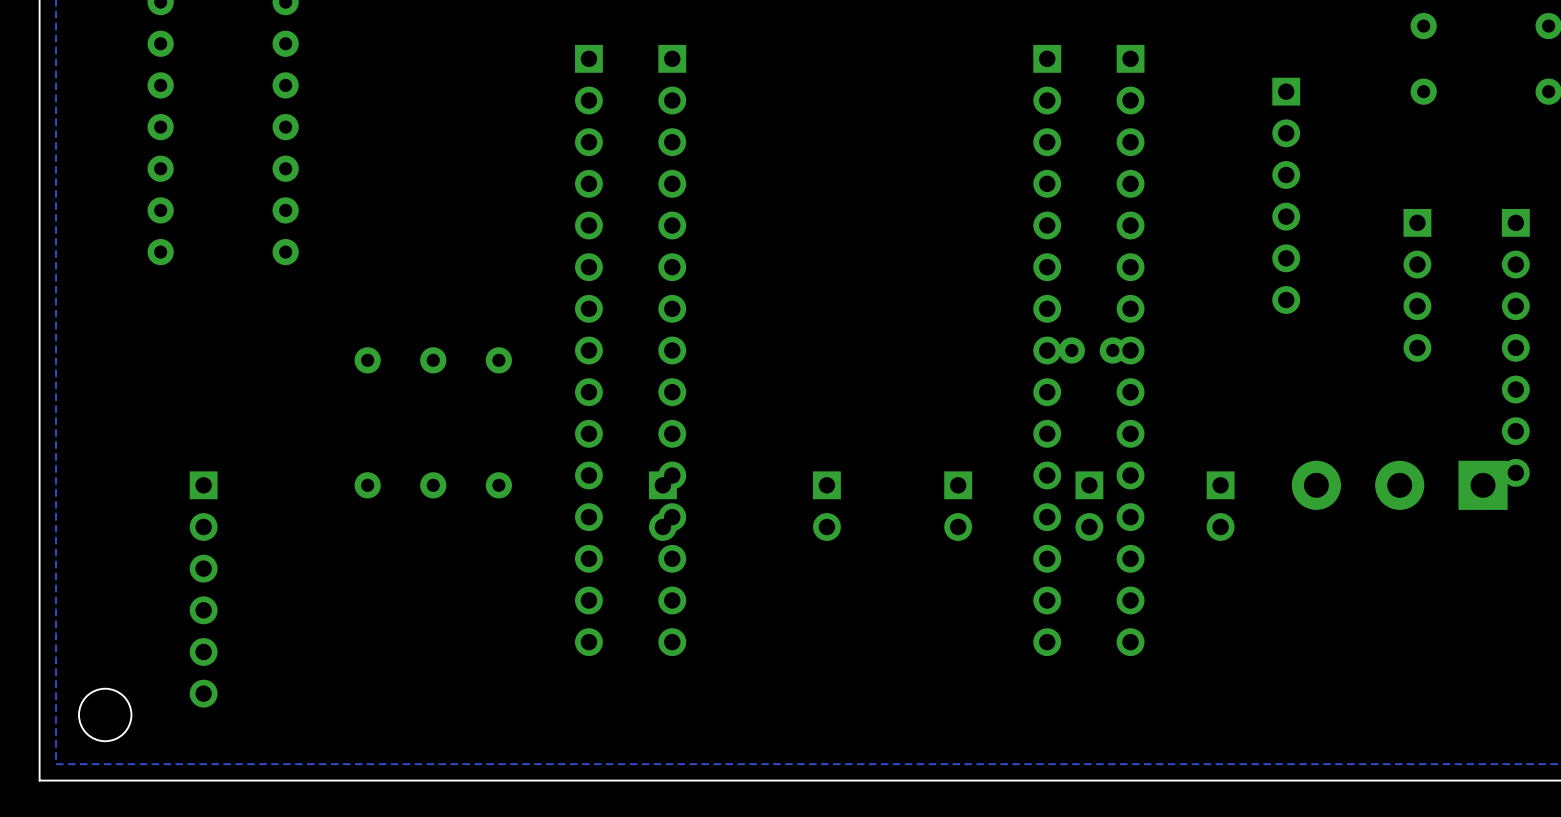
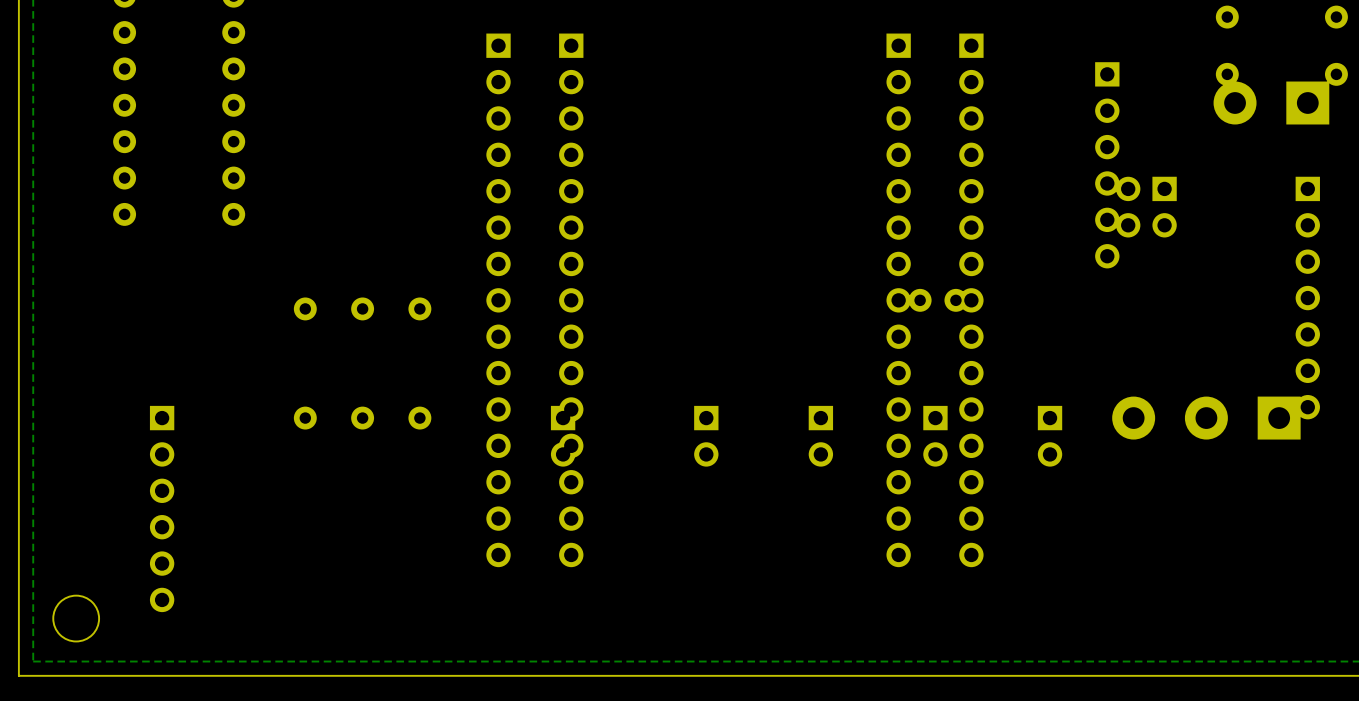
part: none -> (1271, 103)
part: none -> (1146, 207)
part: (1417, 285) -> none

